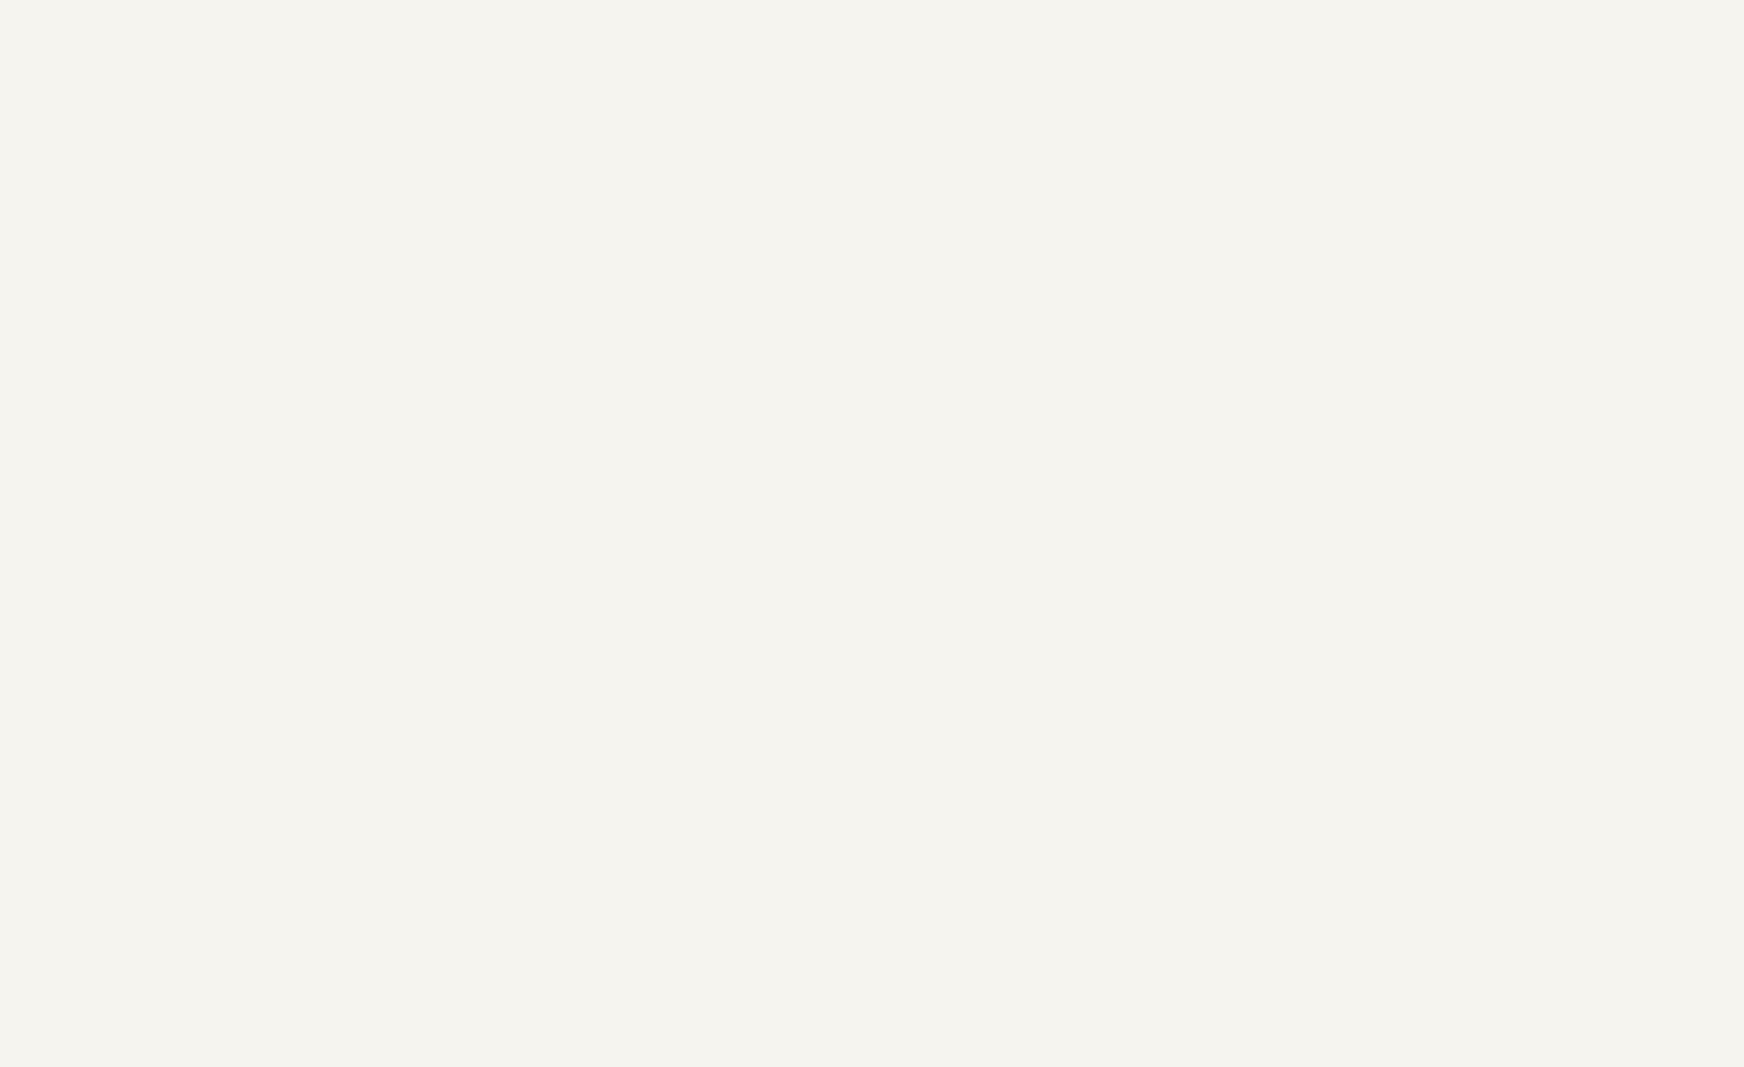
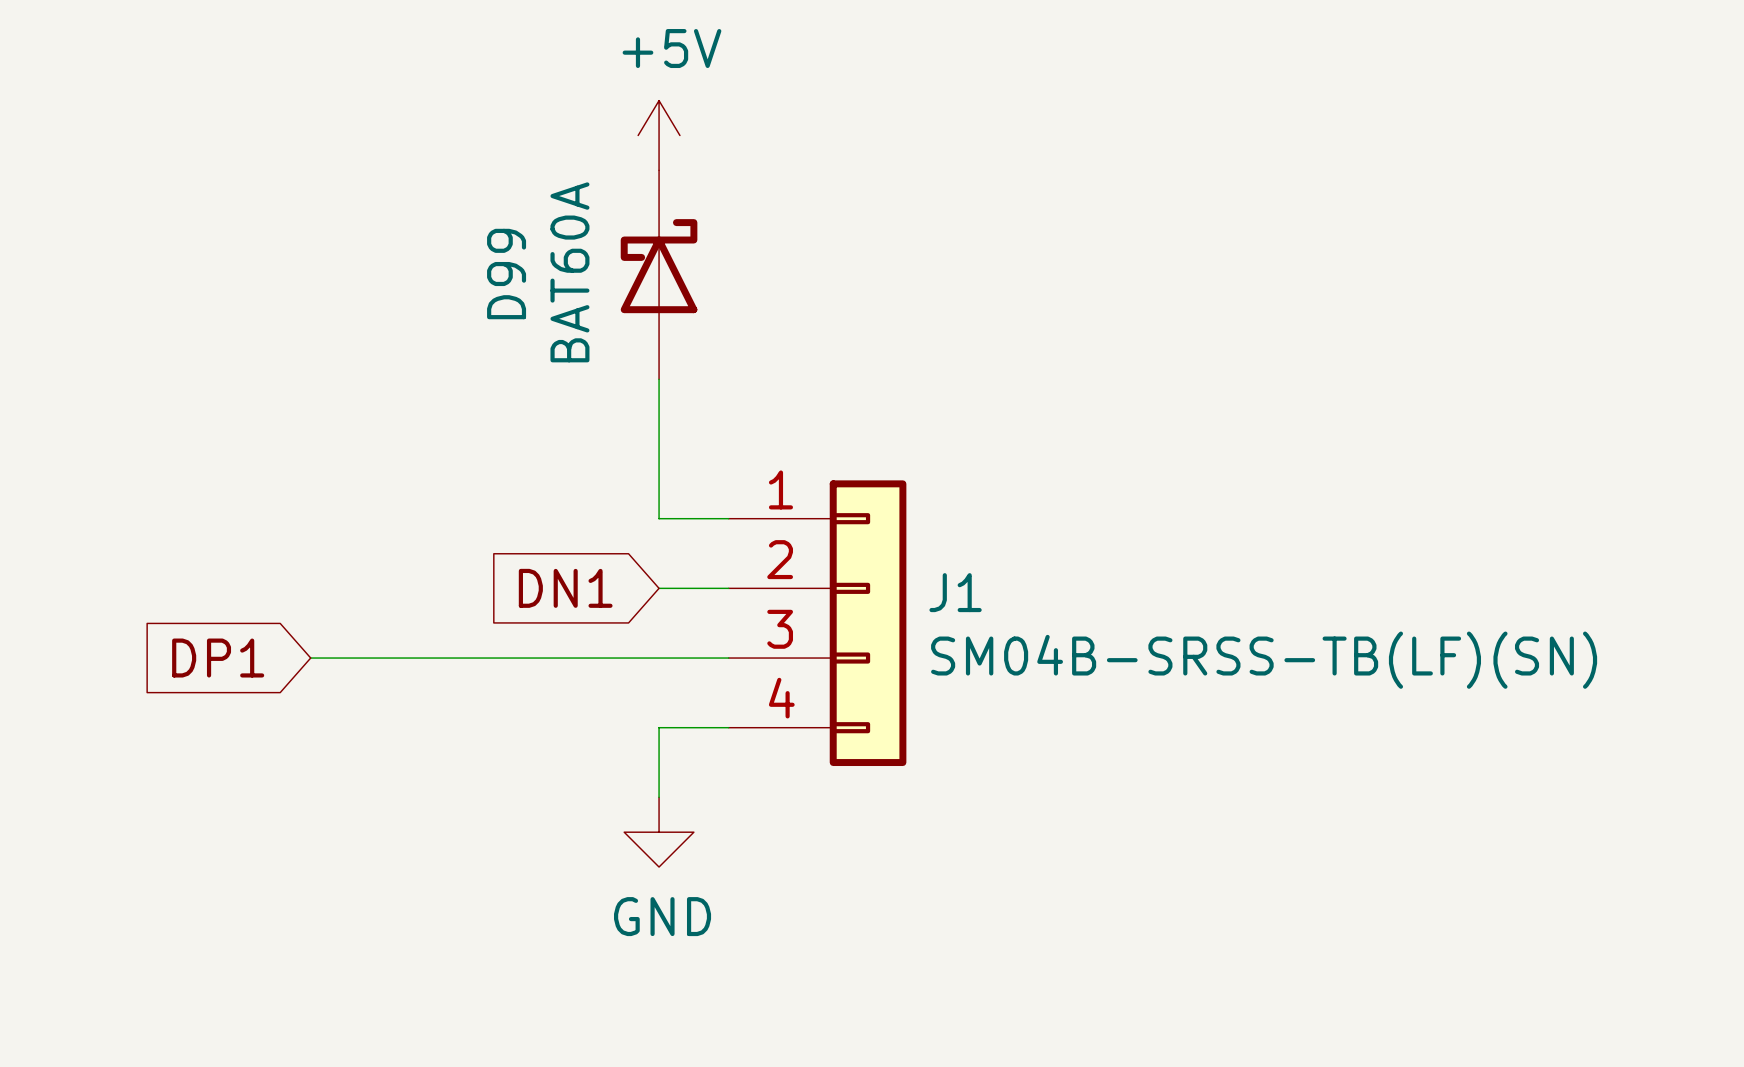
power symbol: none -> +5V (659, 135)
D99: none -> BAT60A (659, 274)
wire: none -> (659, 379) (659, 518) (728, 518)
global label: none -> DN1 (565, 588)
wire: none -> (659, 588) (728, 588)
J1: none -> SM04B-SRSS-TB(LF)(SN) (817, 623)
global label: none -> DP1 (218, 658)
wire: none -> (310, 658) (728, 658)
wire: none -> (728, 727) (659, 727) (659, 797)
power symbol: none -> GND (659, 832)

